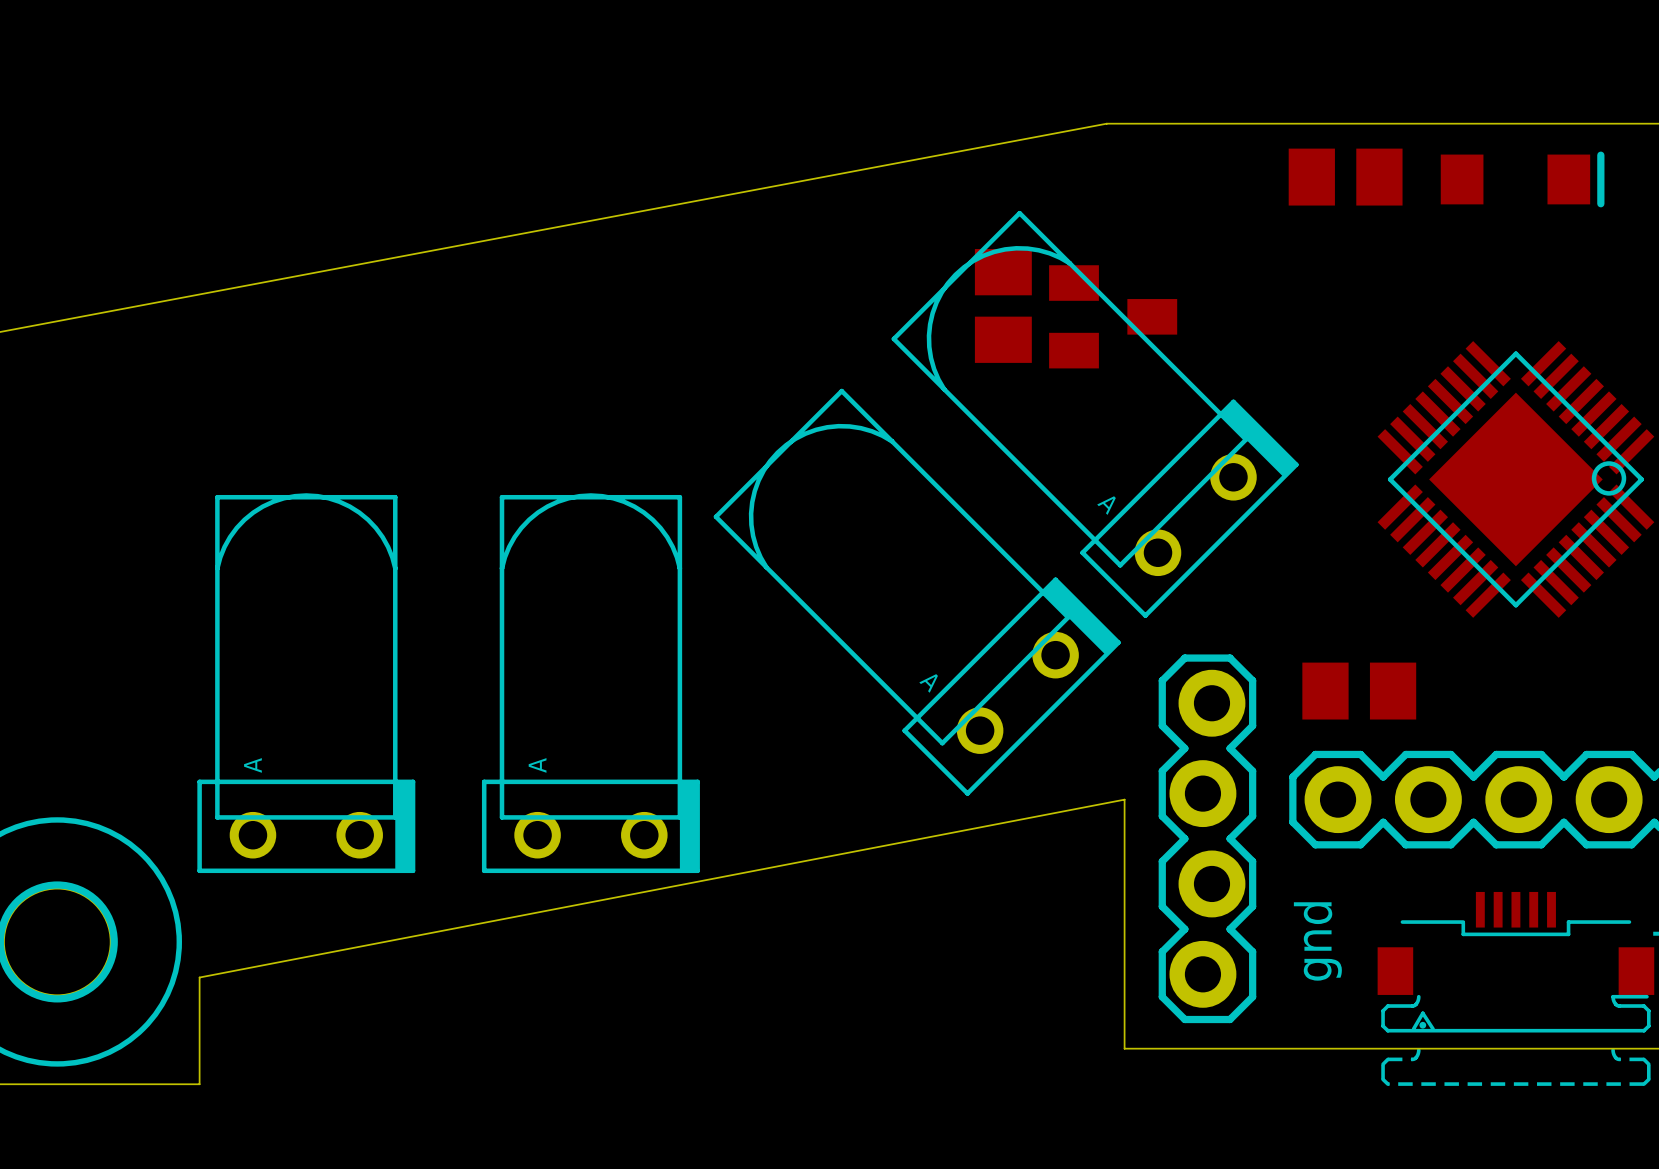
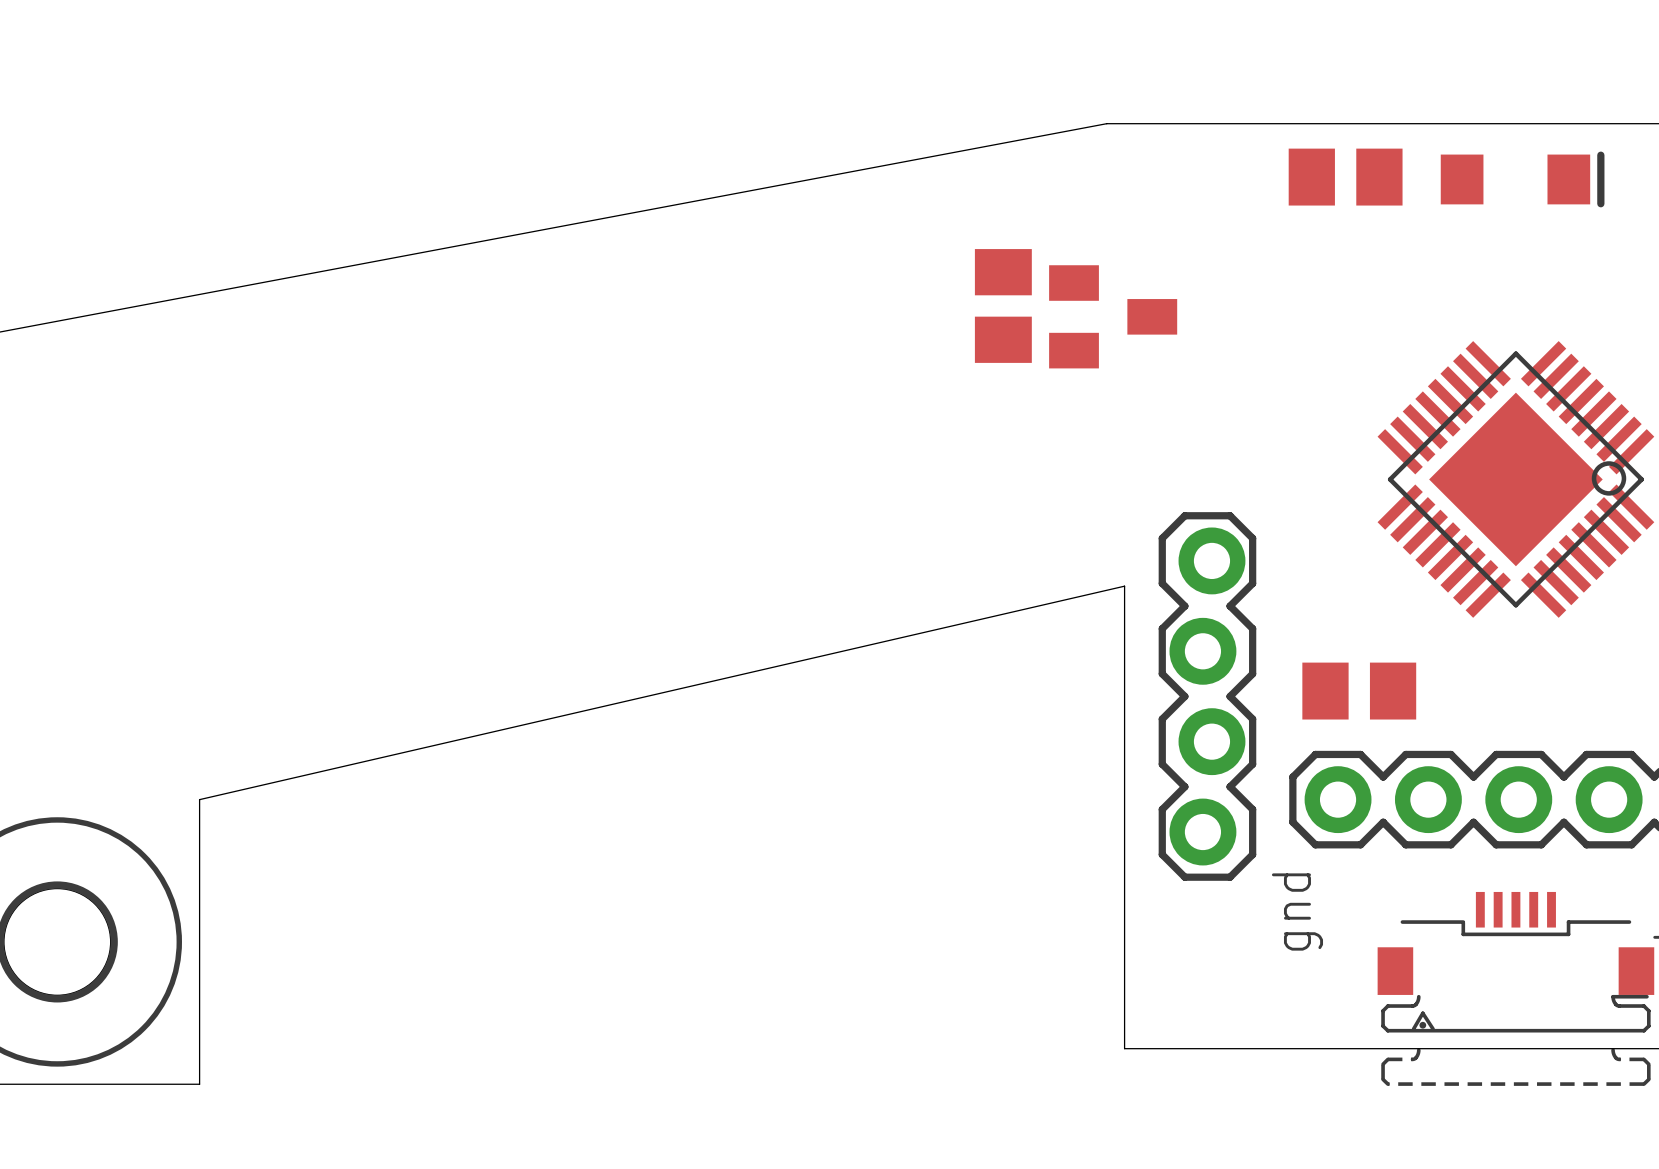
part: (1095, 414) -> none
part: (917, 592) -> none
part: (306, 683) -> none
part: (590, 683) -> none
board edge: (1124, 799) (199, 977) -> (1124, 799) (1124, 586) (199, 799) (199, 977)
part position: (1207, 838) -> (1207, 696)
text position: gnd (1317, 941) -> gnd (1297, 912)

